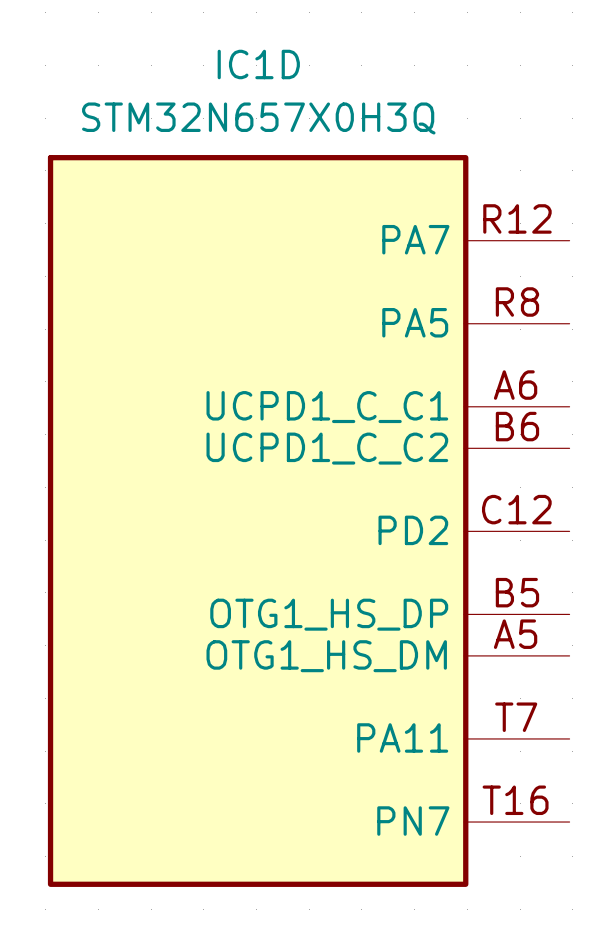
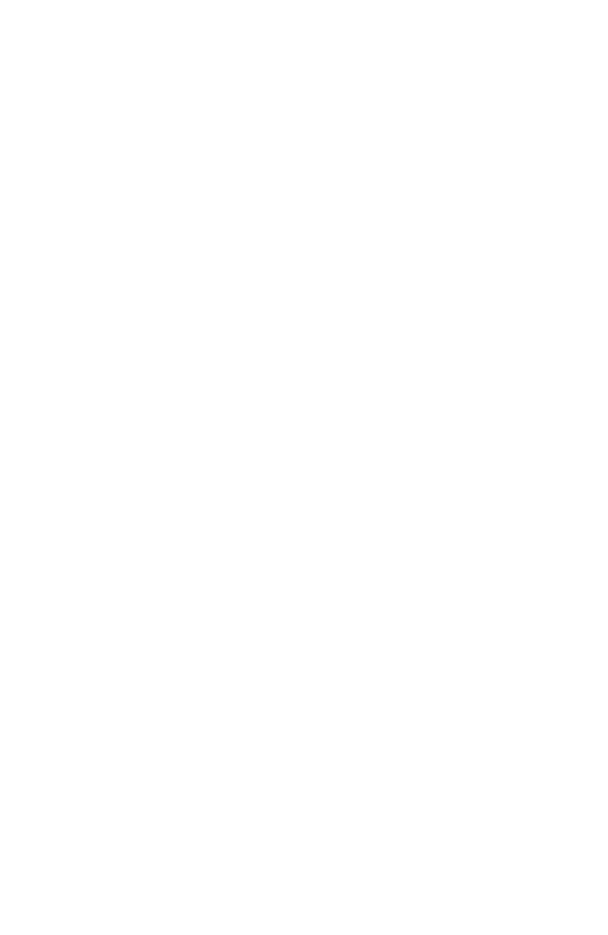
IC1D: STM32N657X0H3Q (308, 520) -> none

